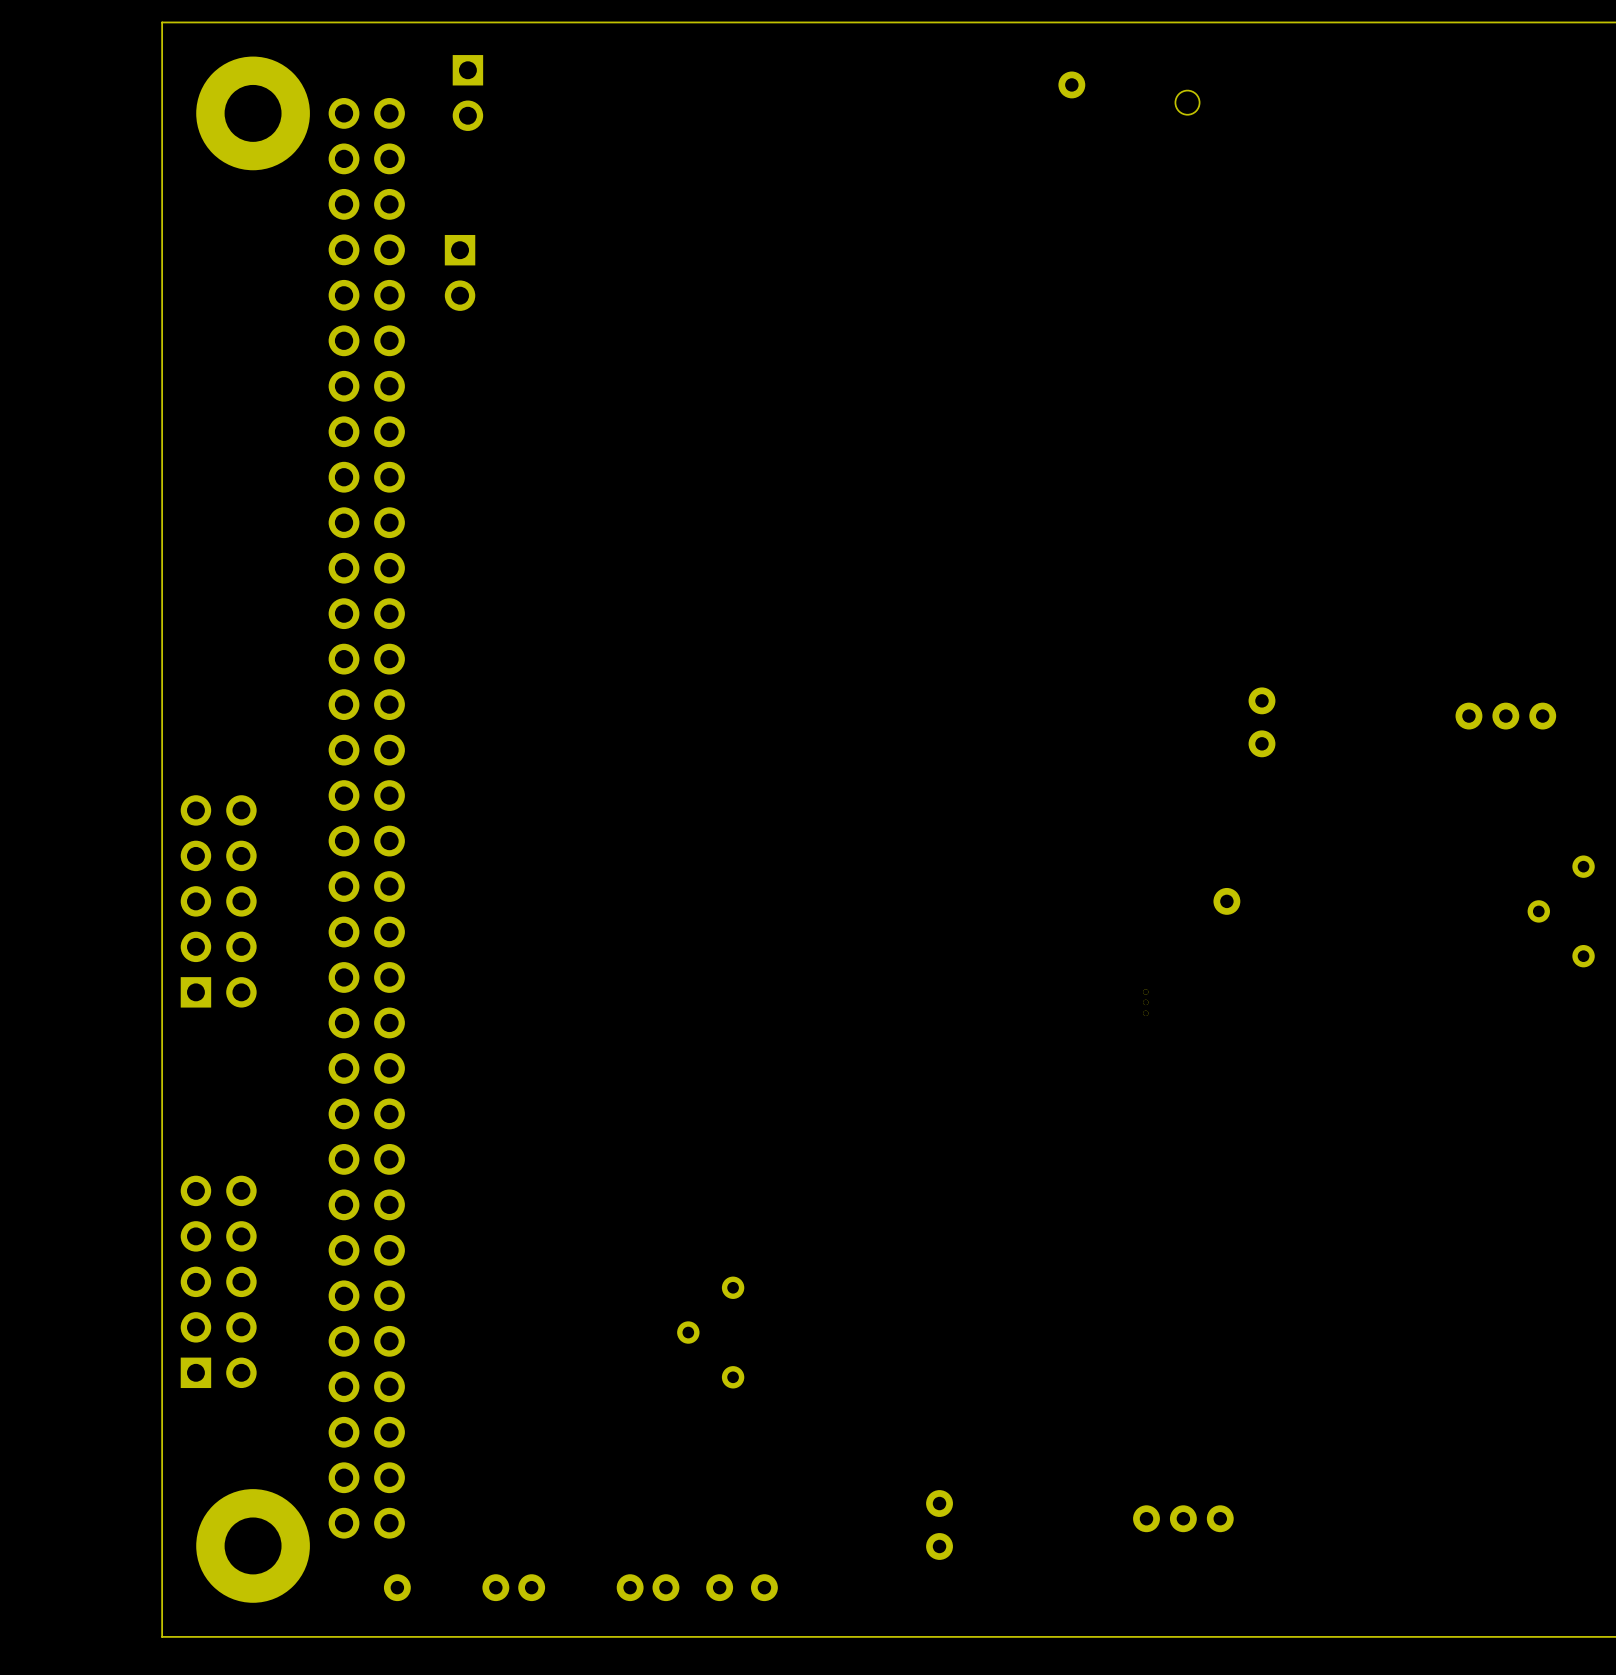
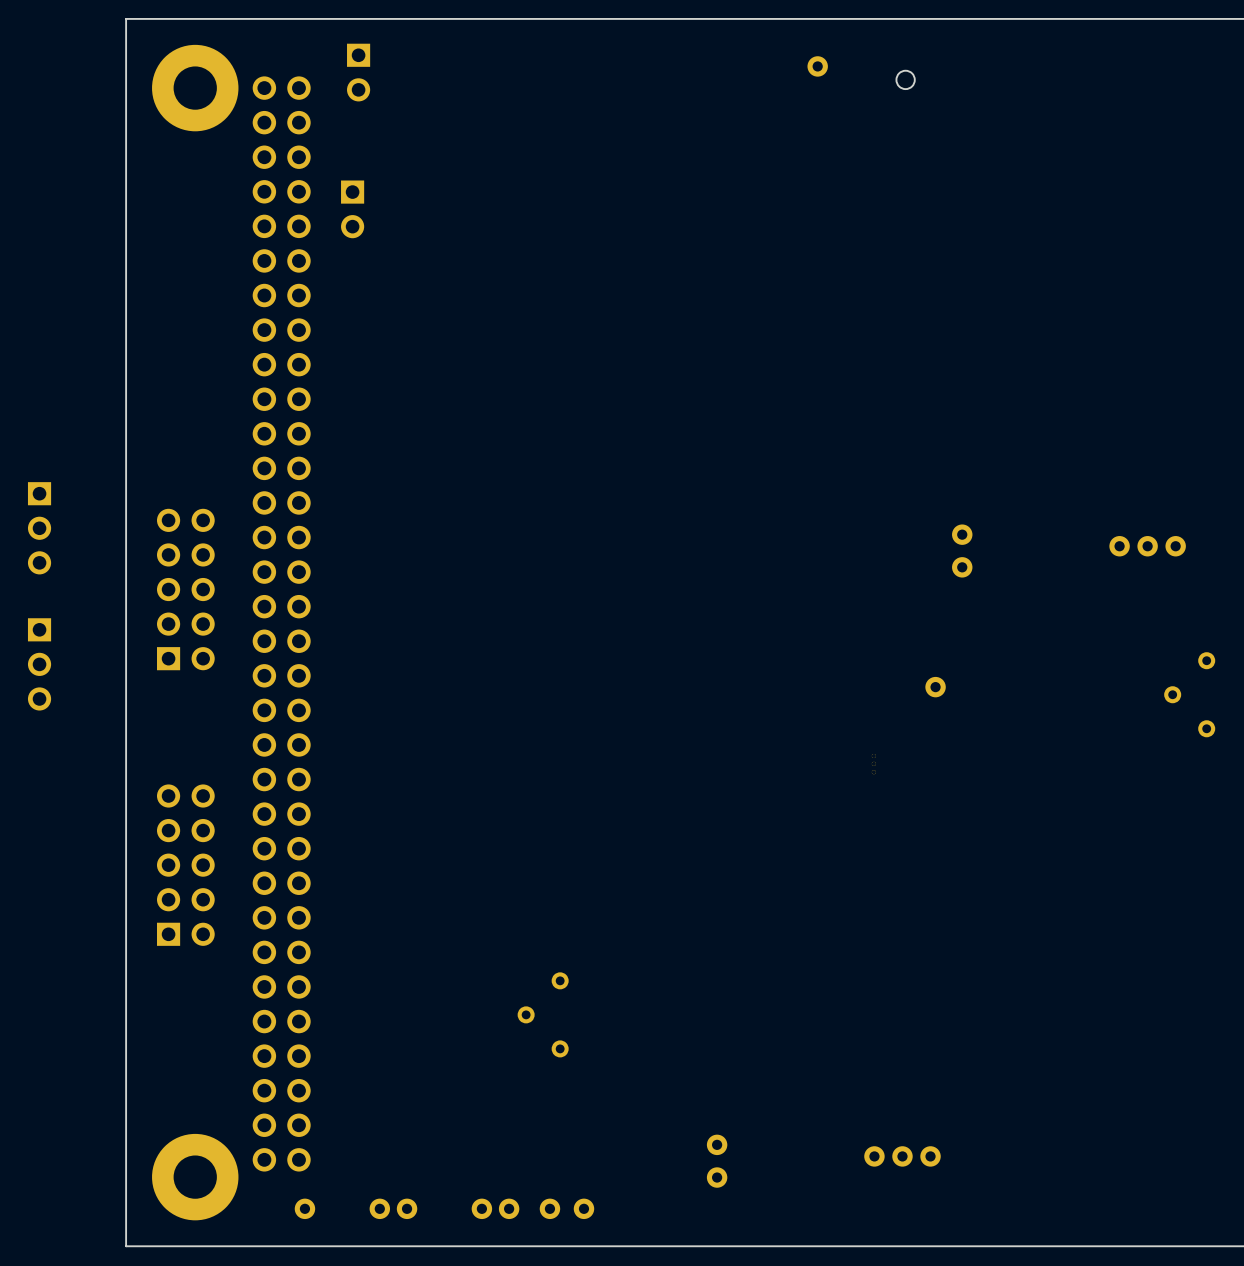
part: none -> (39, 528)
part: none -> (185, 589)
part: none -> (39, 664)
part: (218, 901) -> none
part: none -> (185, 865)
part: (218, 1281) -> none

